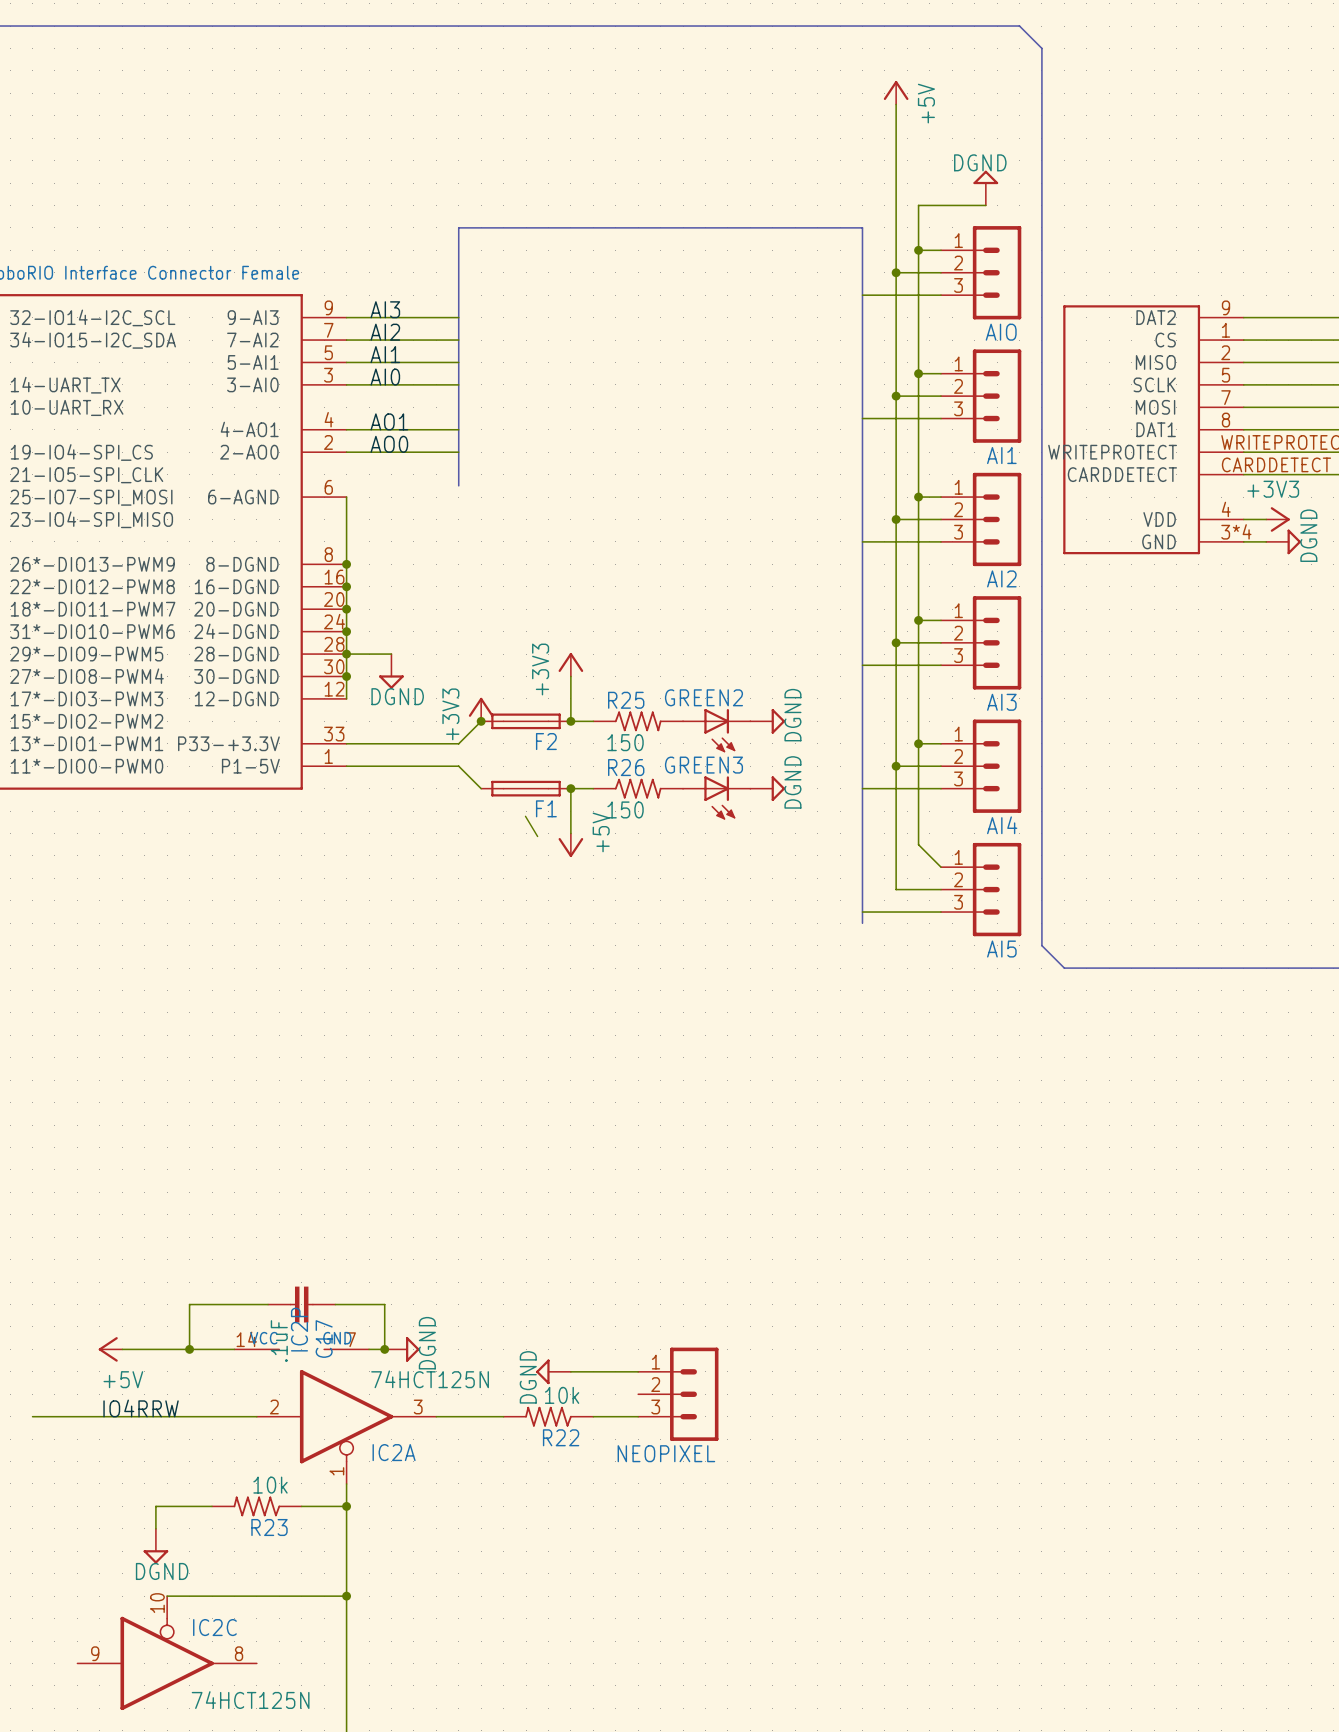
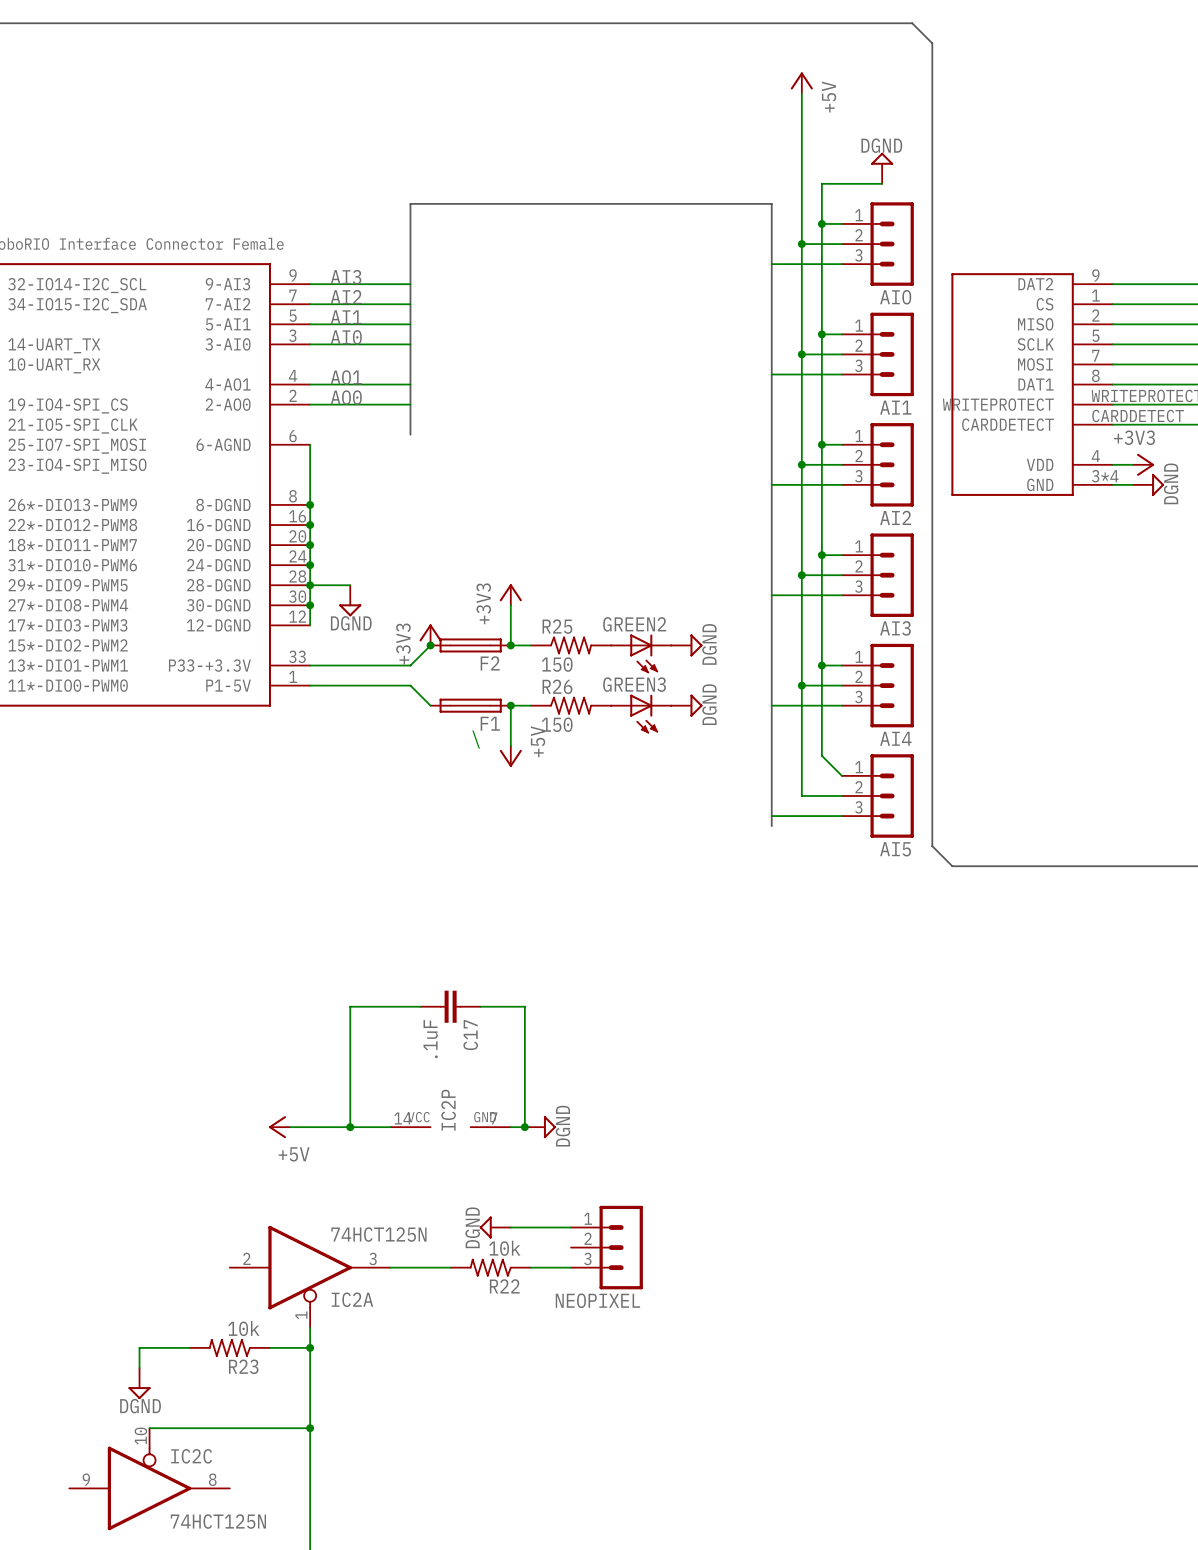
wire: none -> (420, 1006) (350, 1006) (350, 1127)
wire: none -> (480, 1006) (524, 1006) (524, 1127) (510, 1127)
power symbol: none -> +5V (279, 1127)
wire: none -> (290, 1127) (390, 1127)
junction: none -> (350, 1127)
junction: none -> (524, 1127)
power symbol: none -> DGND (540, 1127)
wire: (268, 1304) (189, 1304) (189, 1349) -> none
C17 position: (301, 1304) -> (450, 1006)
wire: (335, 1304) (384, 1304) (384, 1349) (369, 1349) -> none
power symbol: +5V (110, 1349) -> none
wire: (122, 1349) (234, 1349) -> none
junction: (189, 1349) -> none
IC2P position: (301, 1349) -> (450, 1127)
junction: (384, 1349) -> none
power symbol: DGND (402, 1349) -> none
label: IO4RRW (141, 1408) -> none
wire: (32, 1416) (256, 1416) -> none

